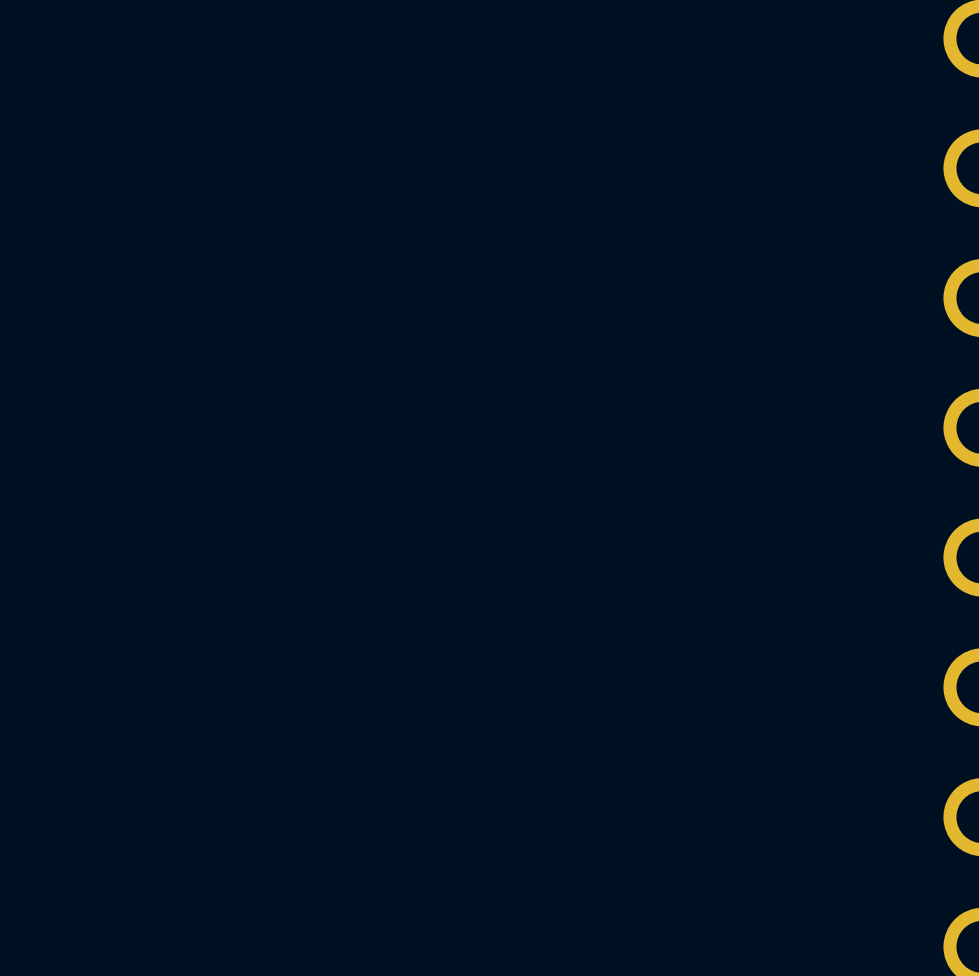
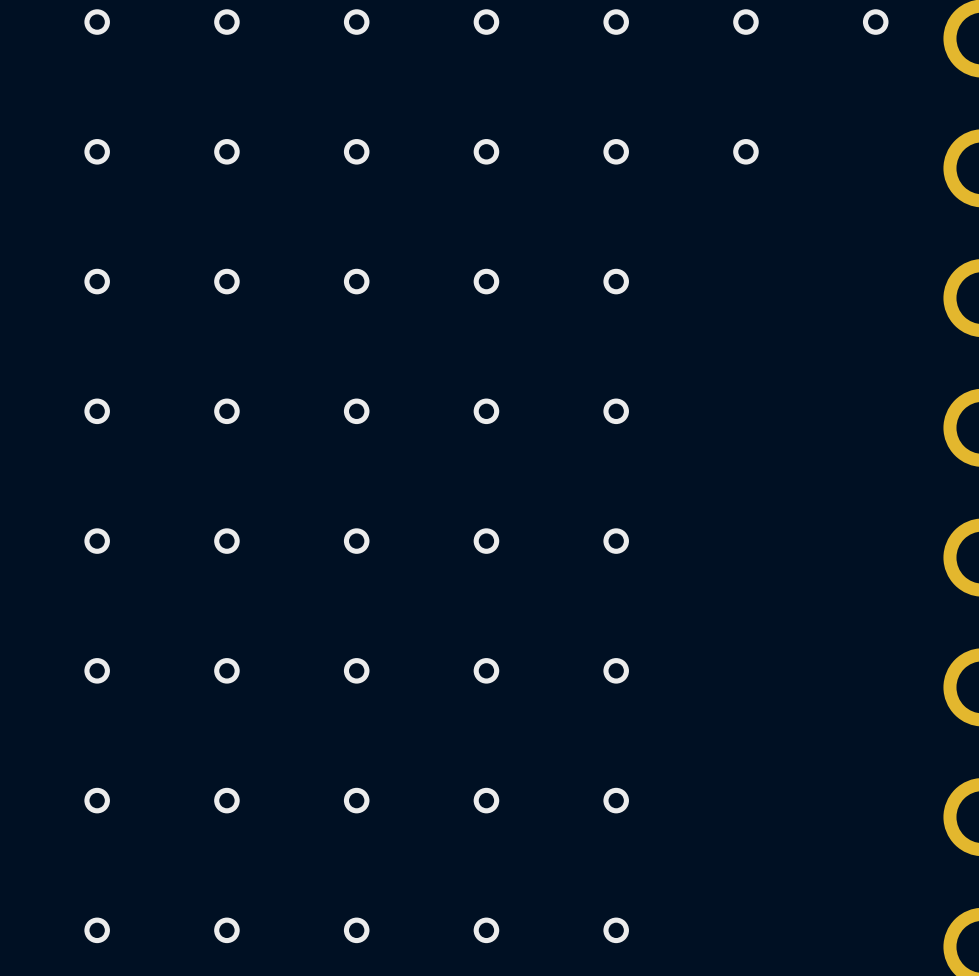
via: none -> (97, 22)
via: none -> (226, 22)
via: none -> (356, 22)
via: none -> (486, 22)
via: none -> (616, 22)
via: none -> (745, 22)
via: none -> (875, 22)
via: none -> (97, 151)
via: none -> (226, 151)
via: none -> (356, 151)
via: none -> (486, 151)
via: none -> (616, 151)
via: none -> (745, 151)
via: none -> (97, 281)
via: none -> (226, 281)
via: none -> (356, 281)
via: none -> (486, 281)
via: none -> (616, 281)
via: none -> (97, 411)
via: none -> (226, 411)
via: none -> (356, 411)
via: none -> (486, 411)
via: none -> (616, 411)
via: none -> (97, 541)
via: none -> (226, 541)
via: none -> (356, 541)
via: none -> (486, 541)
via: none -> (616, 541)
via: none -> (97, 670)
via: none -> (226, 670)
via: none -> (356, 670)
via: none -> (486, 670)
via: none -> (616, 670)
via: none -> (97, 800)
via: none -> (226, 800)
via: none -> (356, 800)
via: none -> (486, 800)
via: none -> (616, 800)
via: none -> (97, 930)
via: none -> (226, 930)
via: none -> (356, 930)
via: none -> (486, 930)
via: none -> (616, 930)

